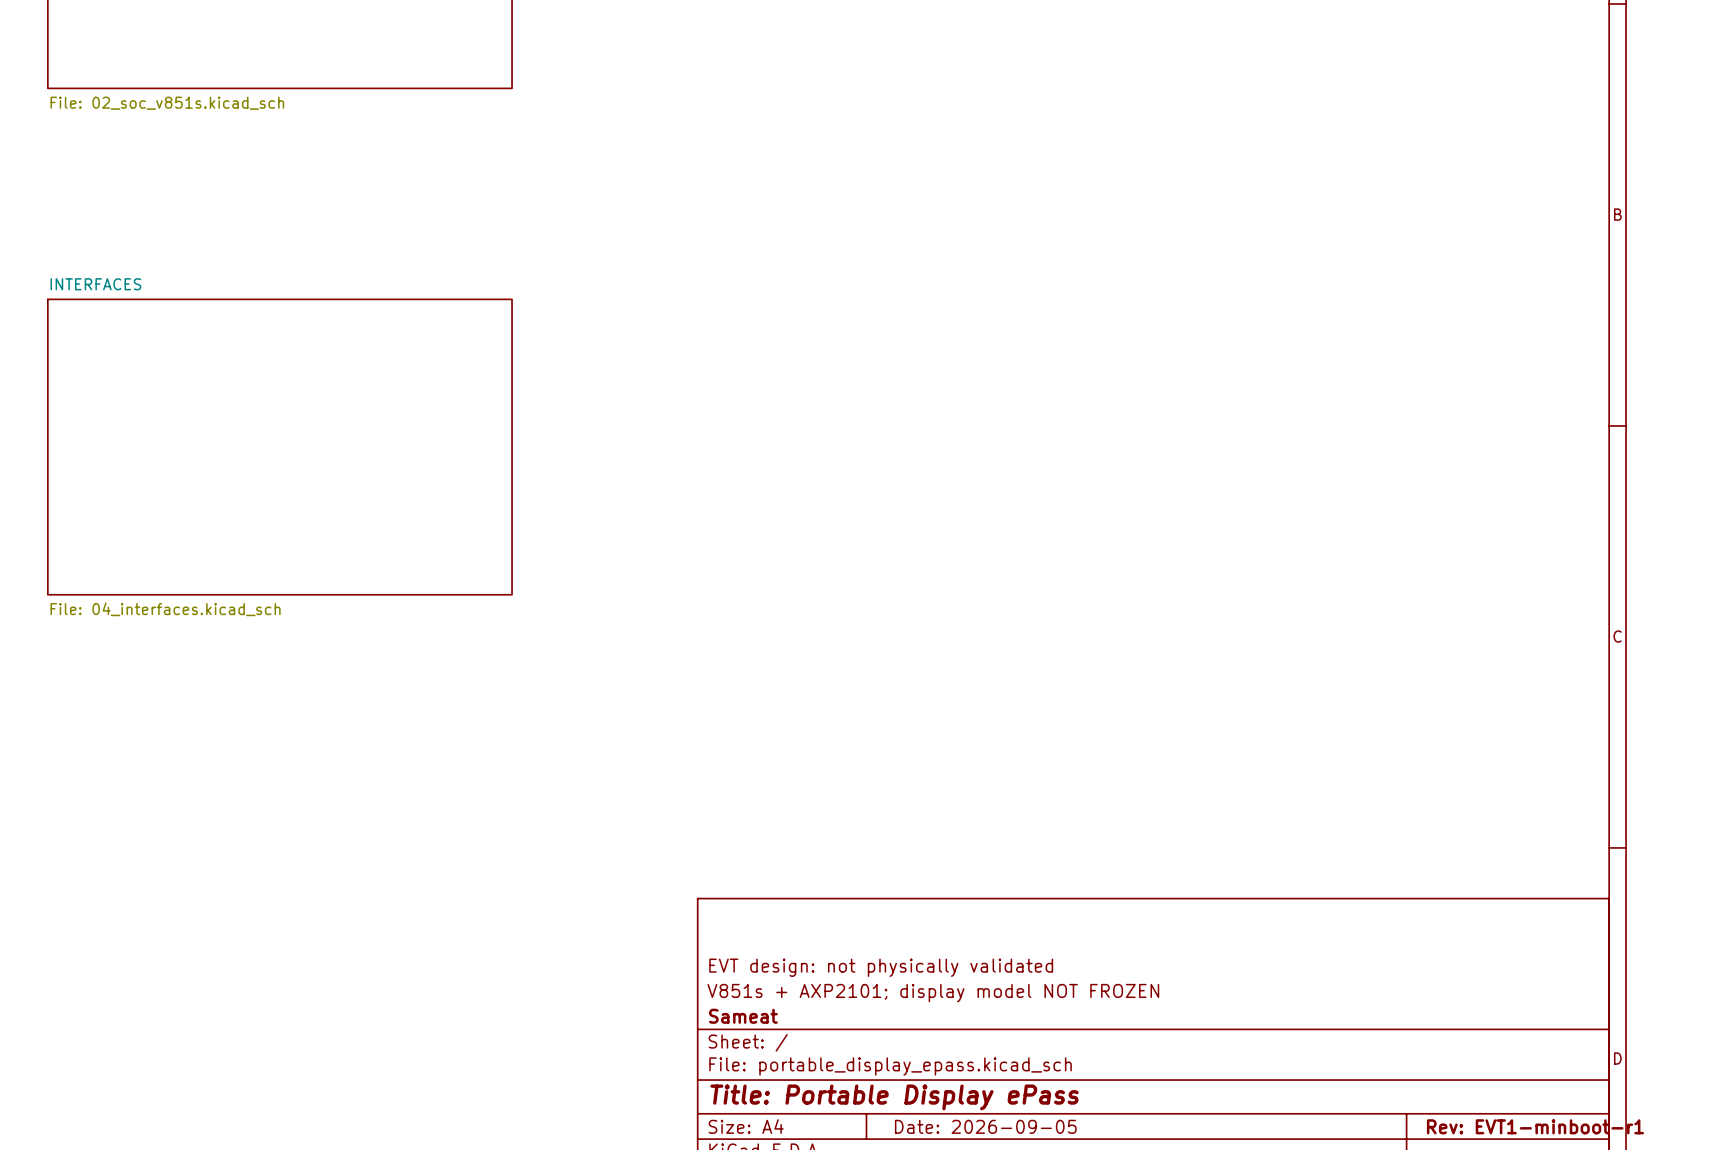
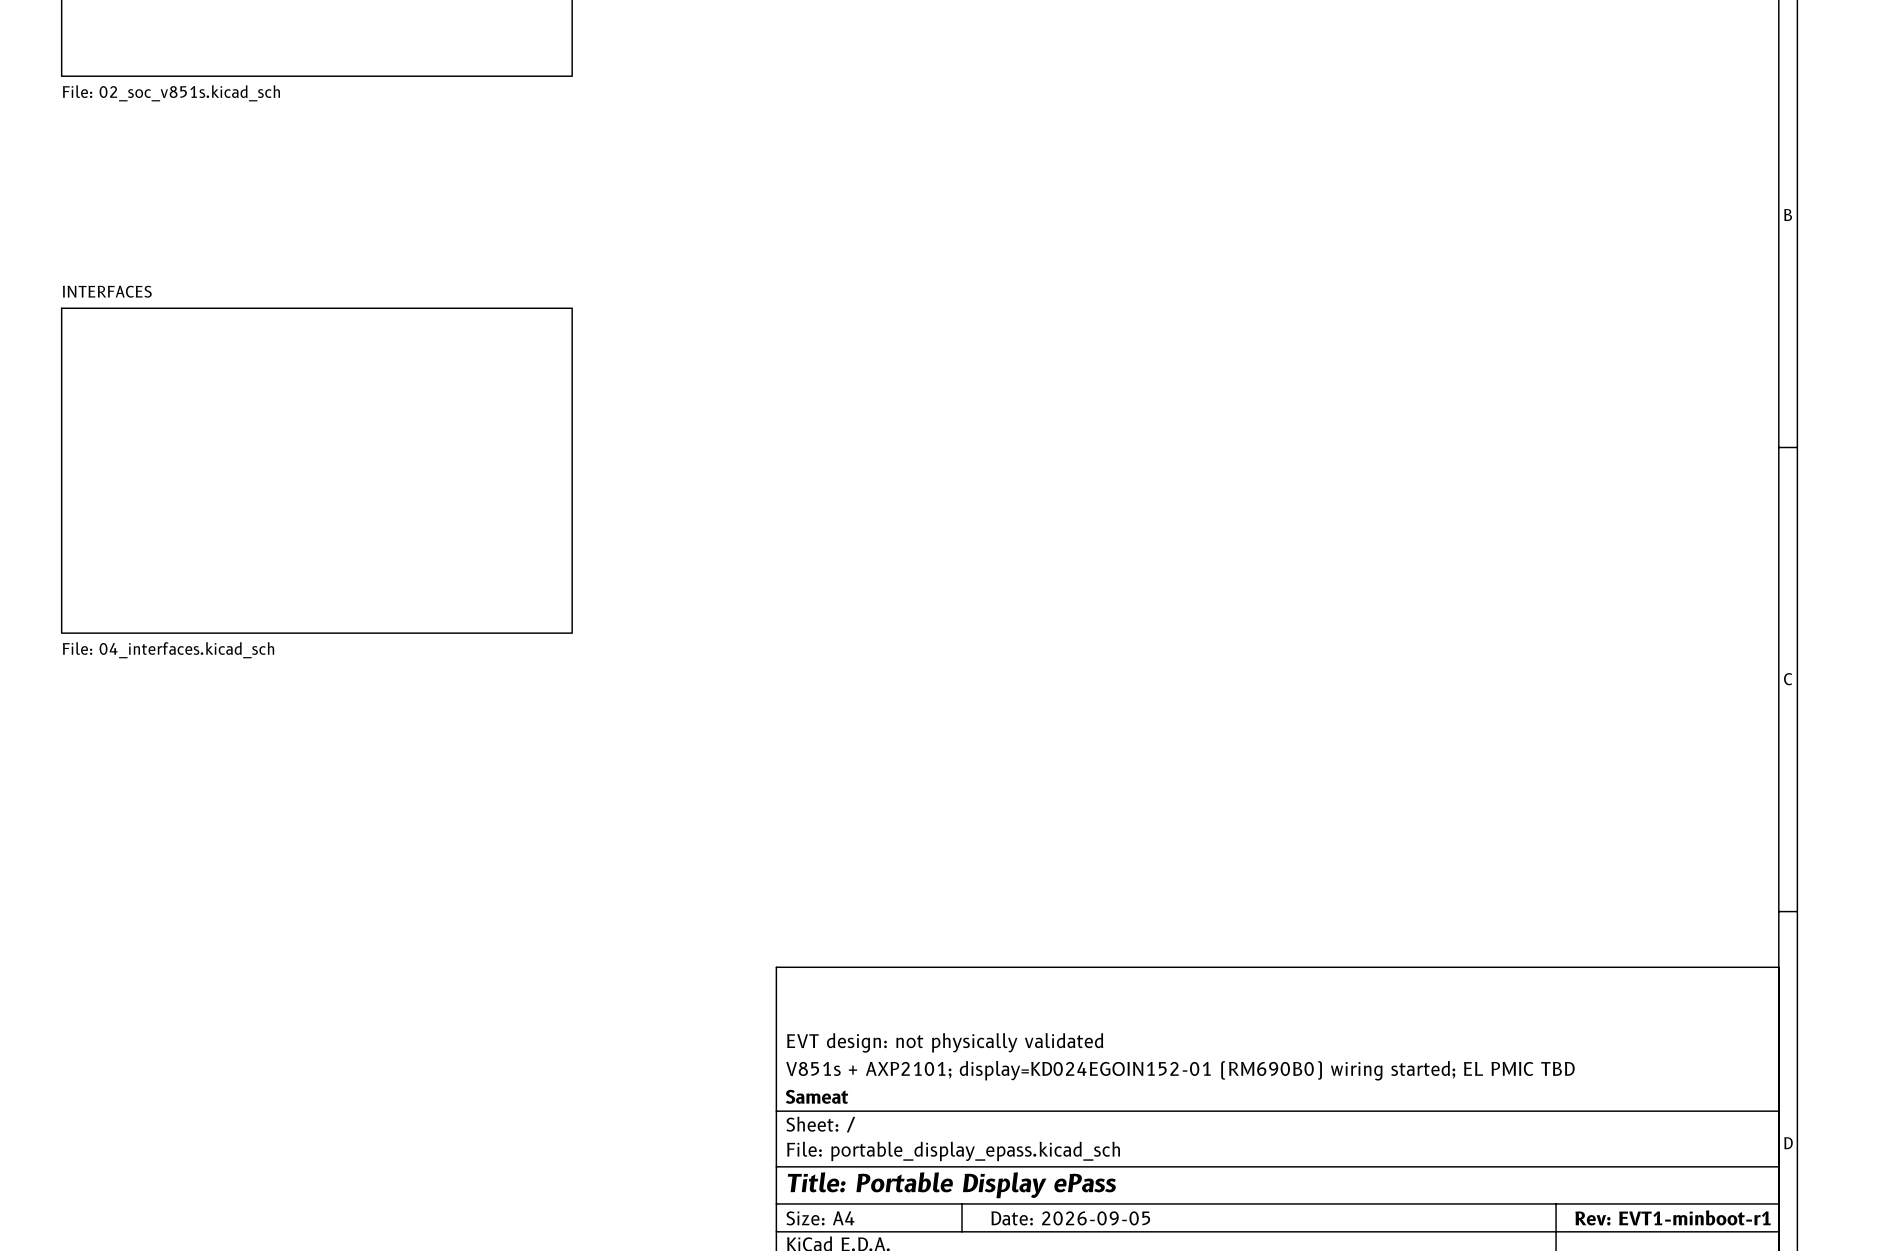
title block: V851s + AXP2101; display model NOT FROZEN (933, 993) -> V851s + AXP2101; display=KD024EGOIN152-01 (RM690B0) wiring started; EL PMIC TBD (1180, 1070)

